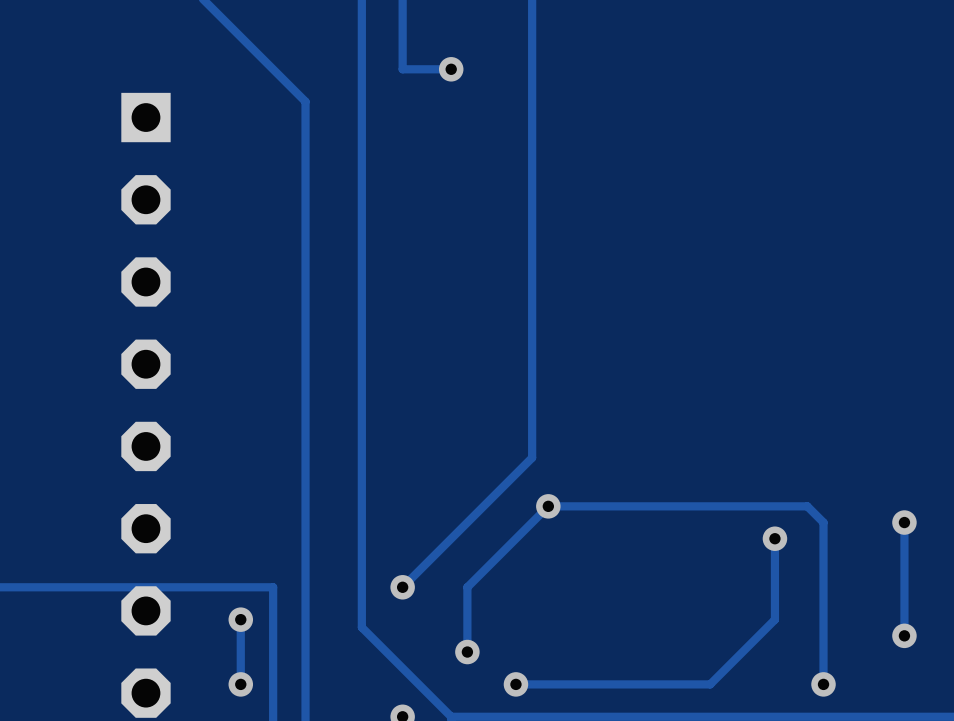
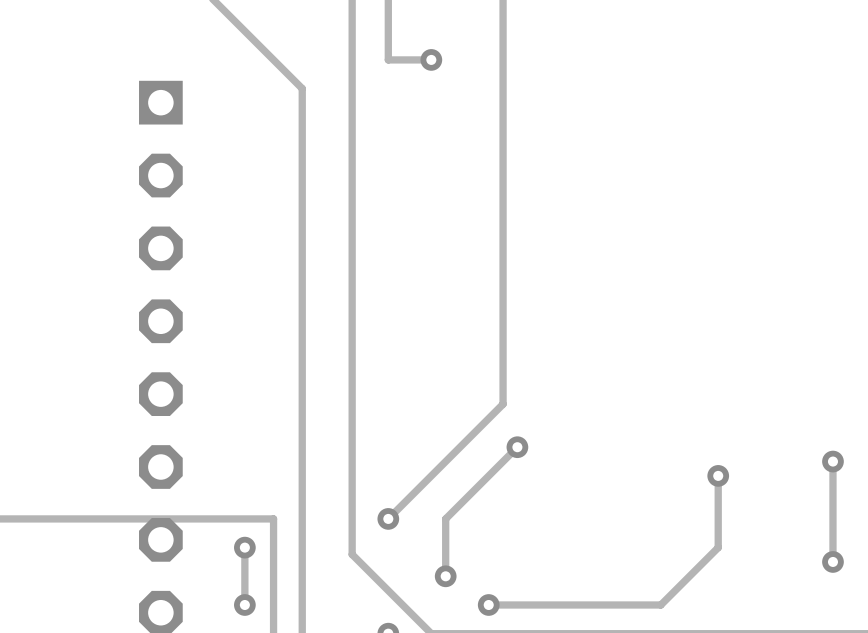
track: (548, 506) (807, 506) (823, 522) (823, 684) -> none
via: (823, 684) -> none

